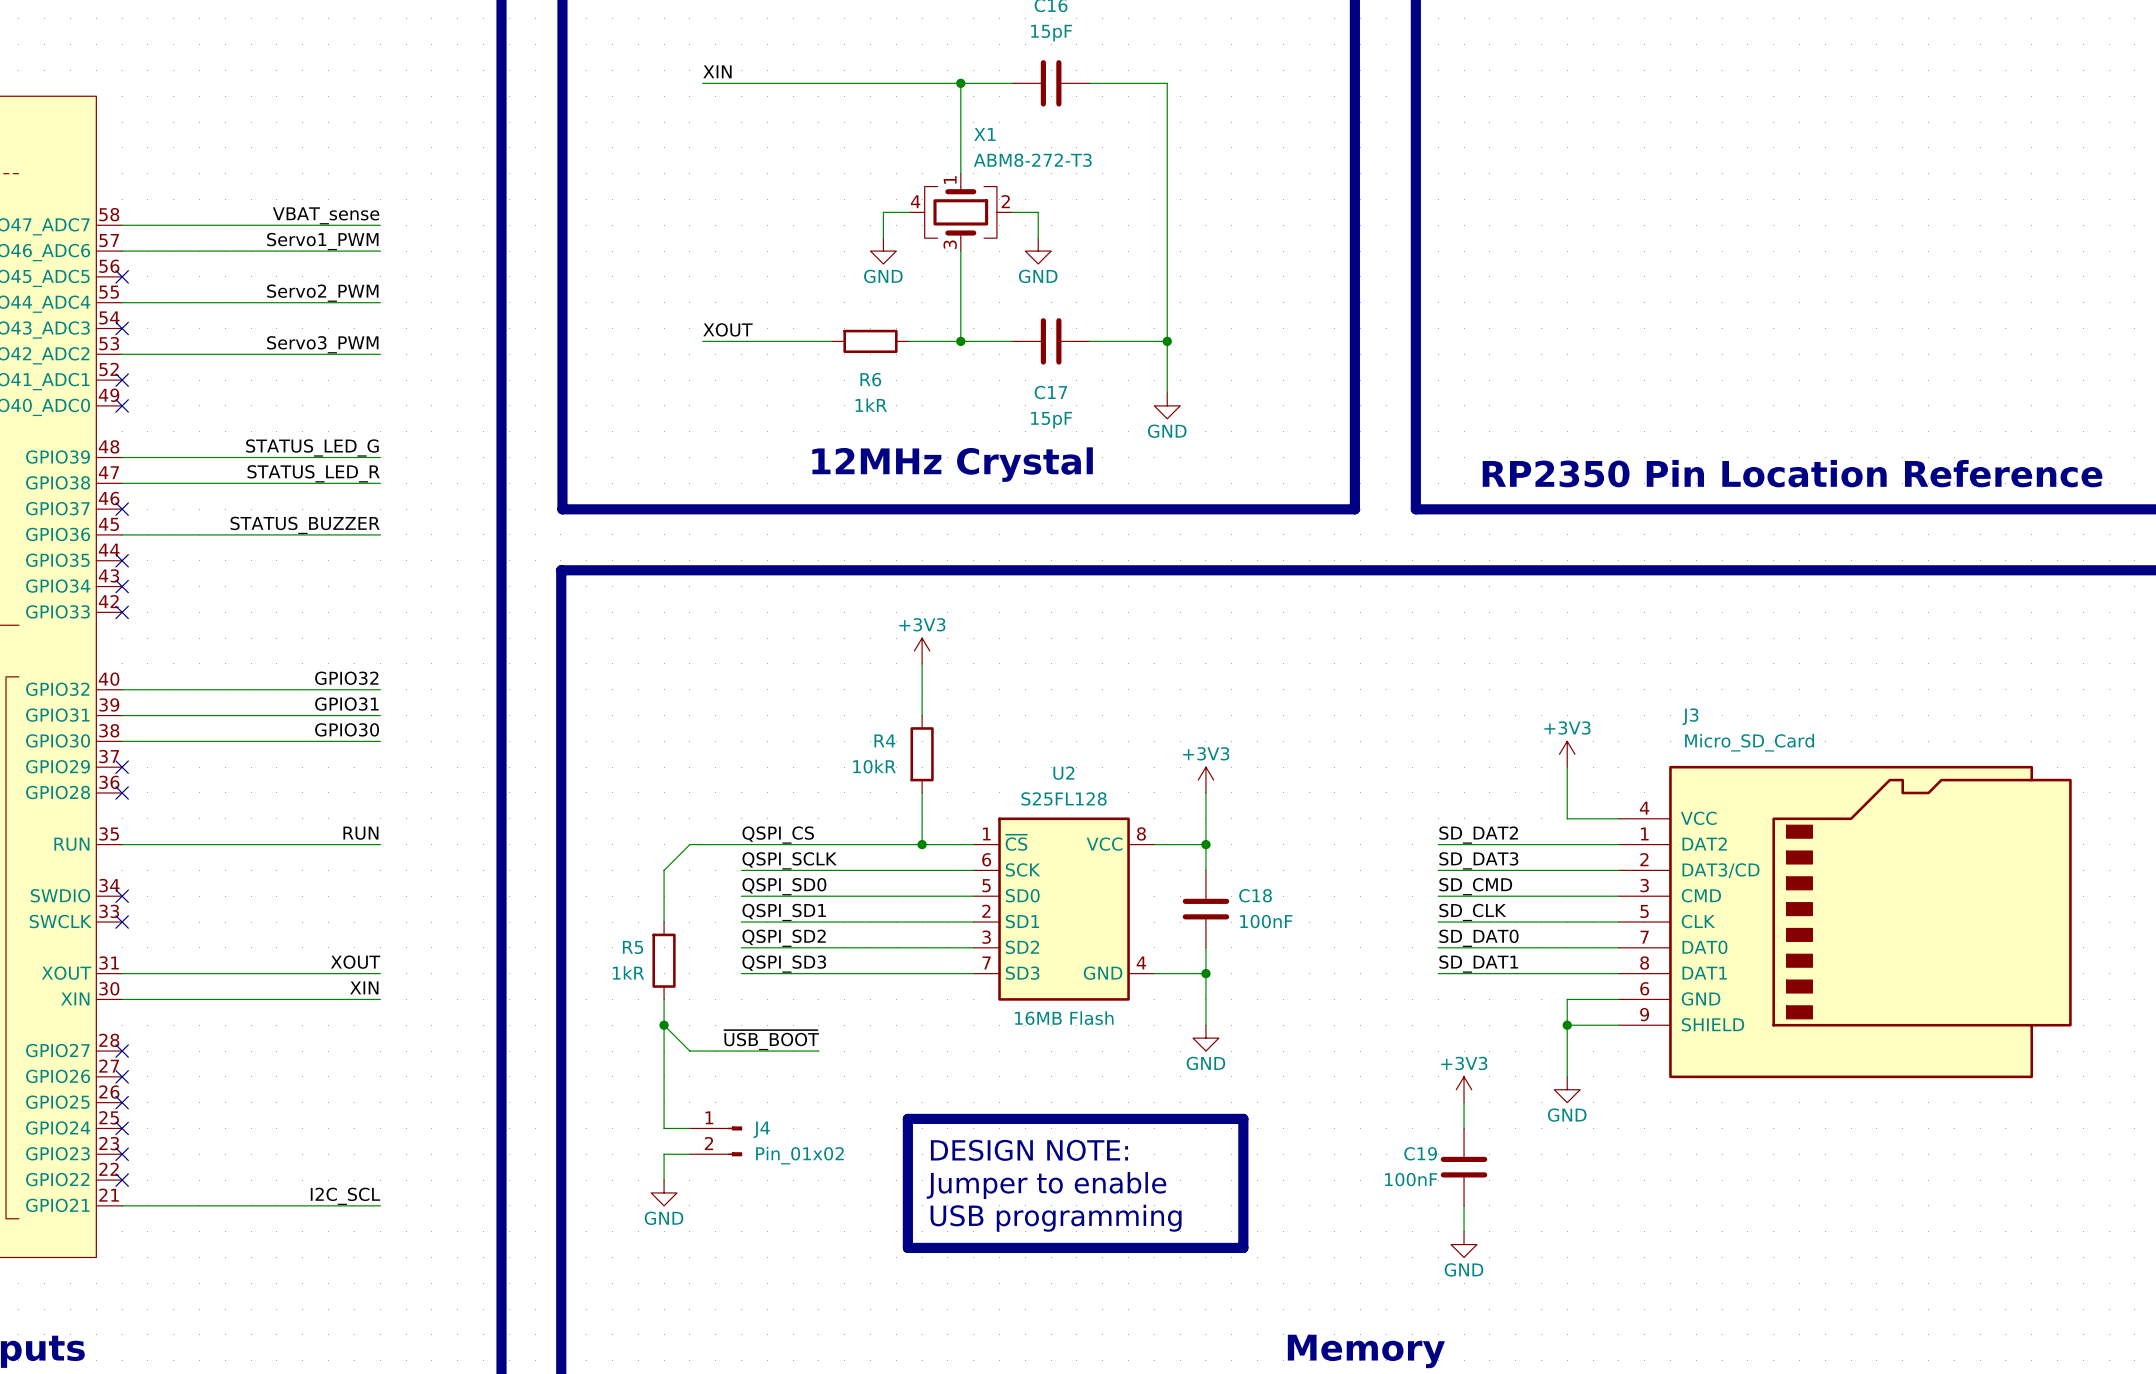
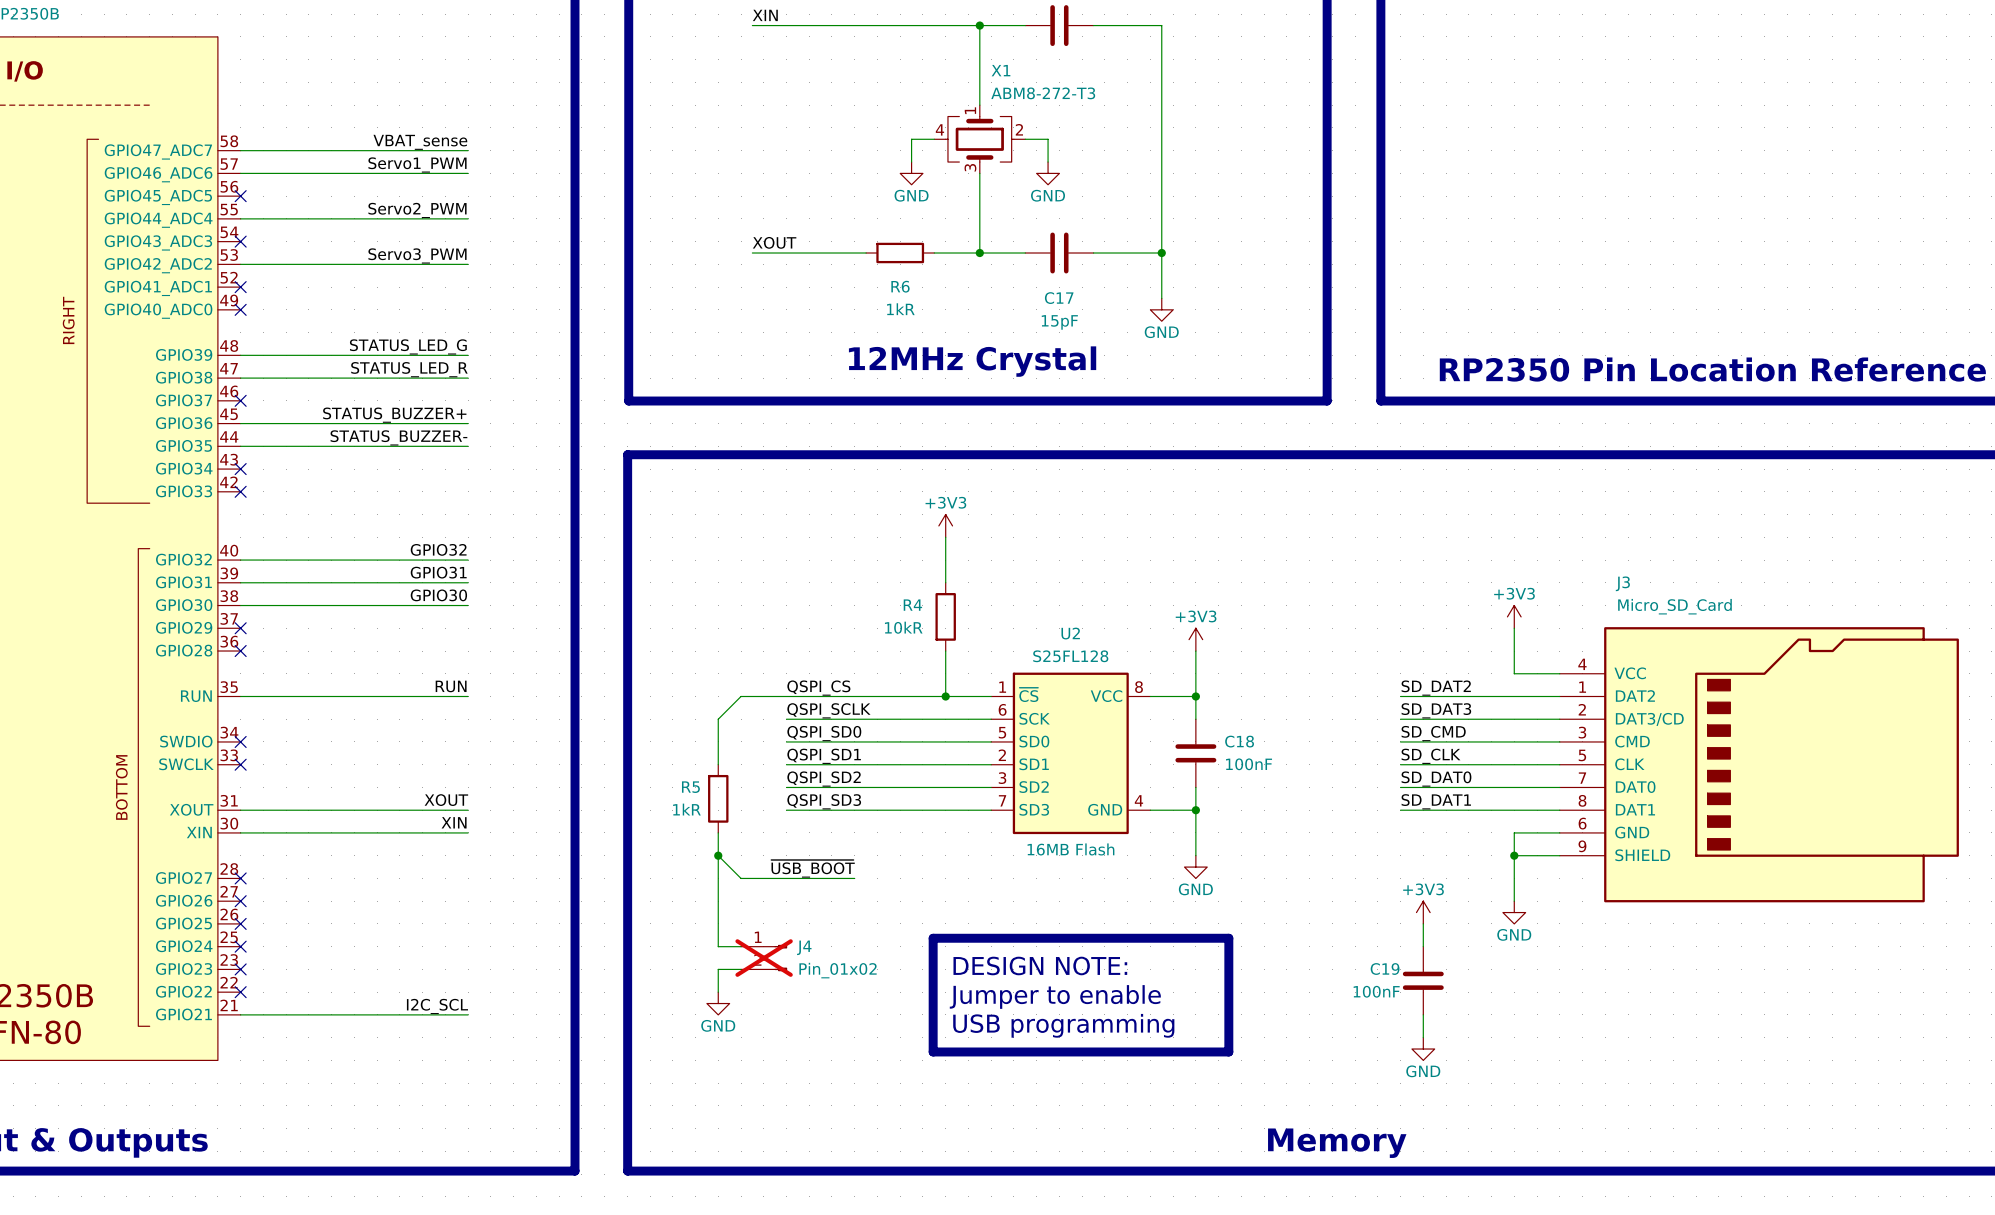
label: STATUS_BUZZER (305, 525) -> STATUS_BUZZER+ (394, 415)
label: none -> STATUS_BUZZER- (398, 437)
wire: none -> (240, 446) (468, 446)
no-connect mark: (122, 560) -> none
J4 do-not-place cross: none -> (764, 958)

